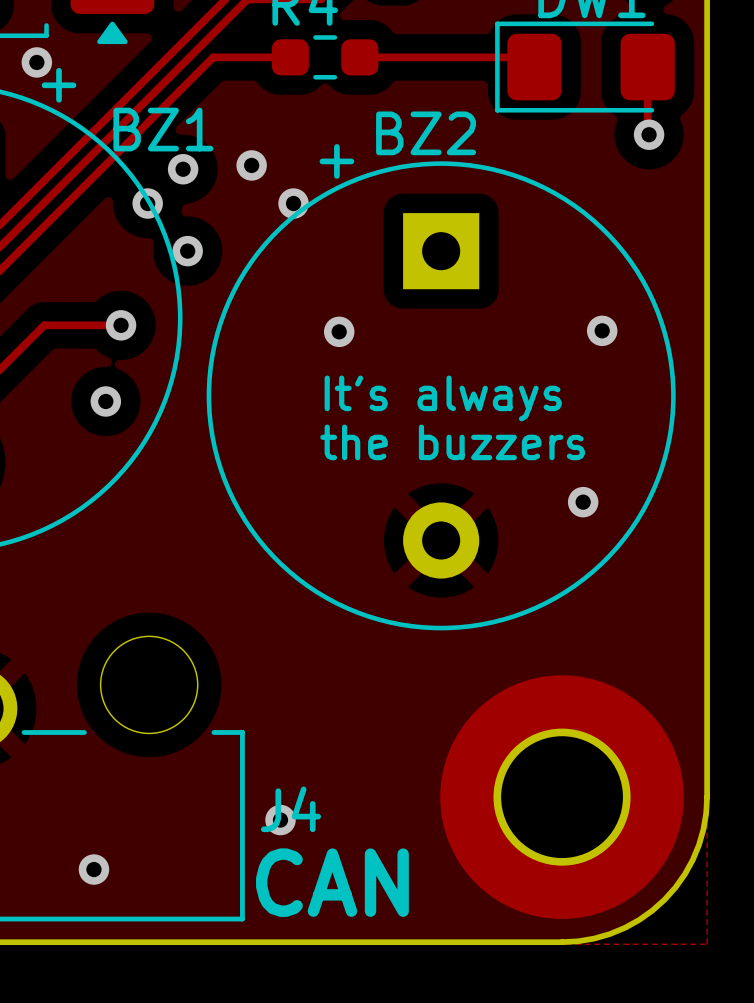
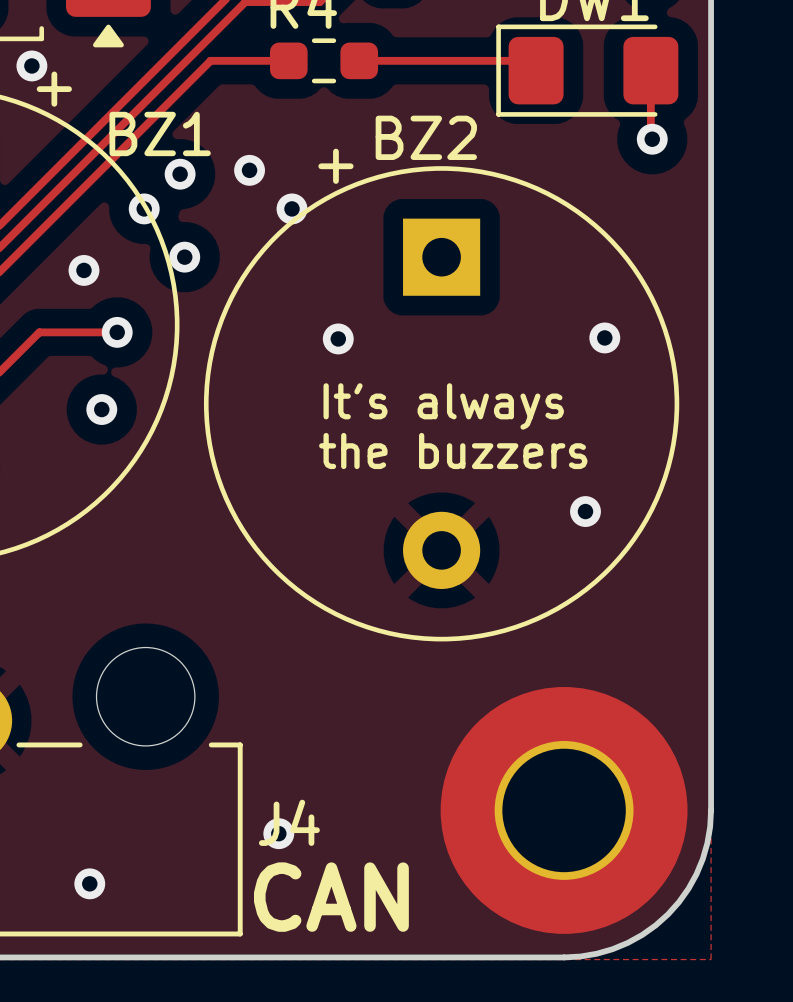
via: none -> (83, 270)

